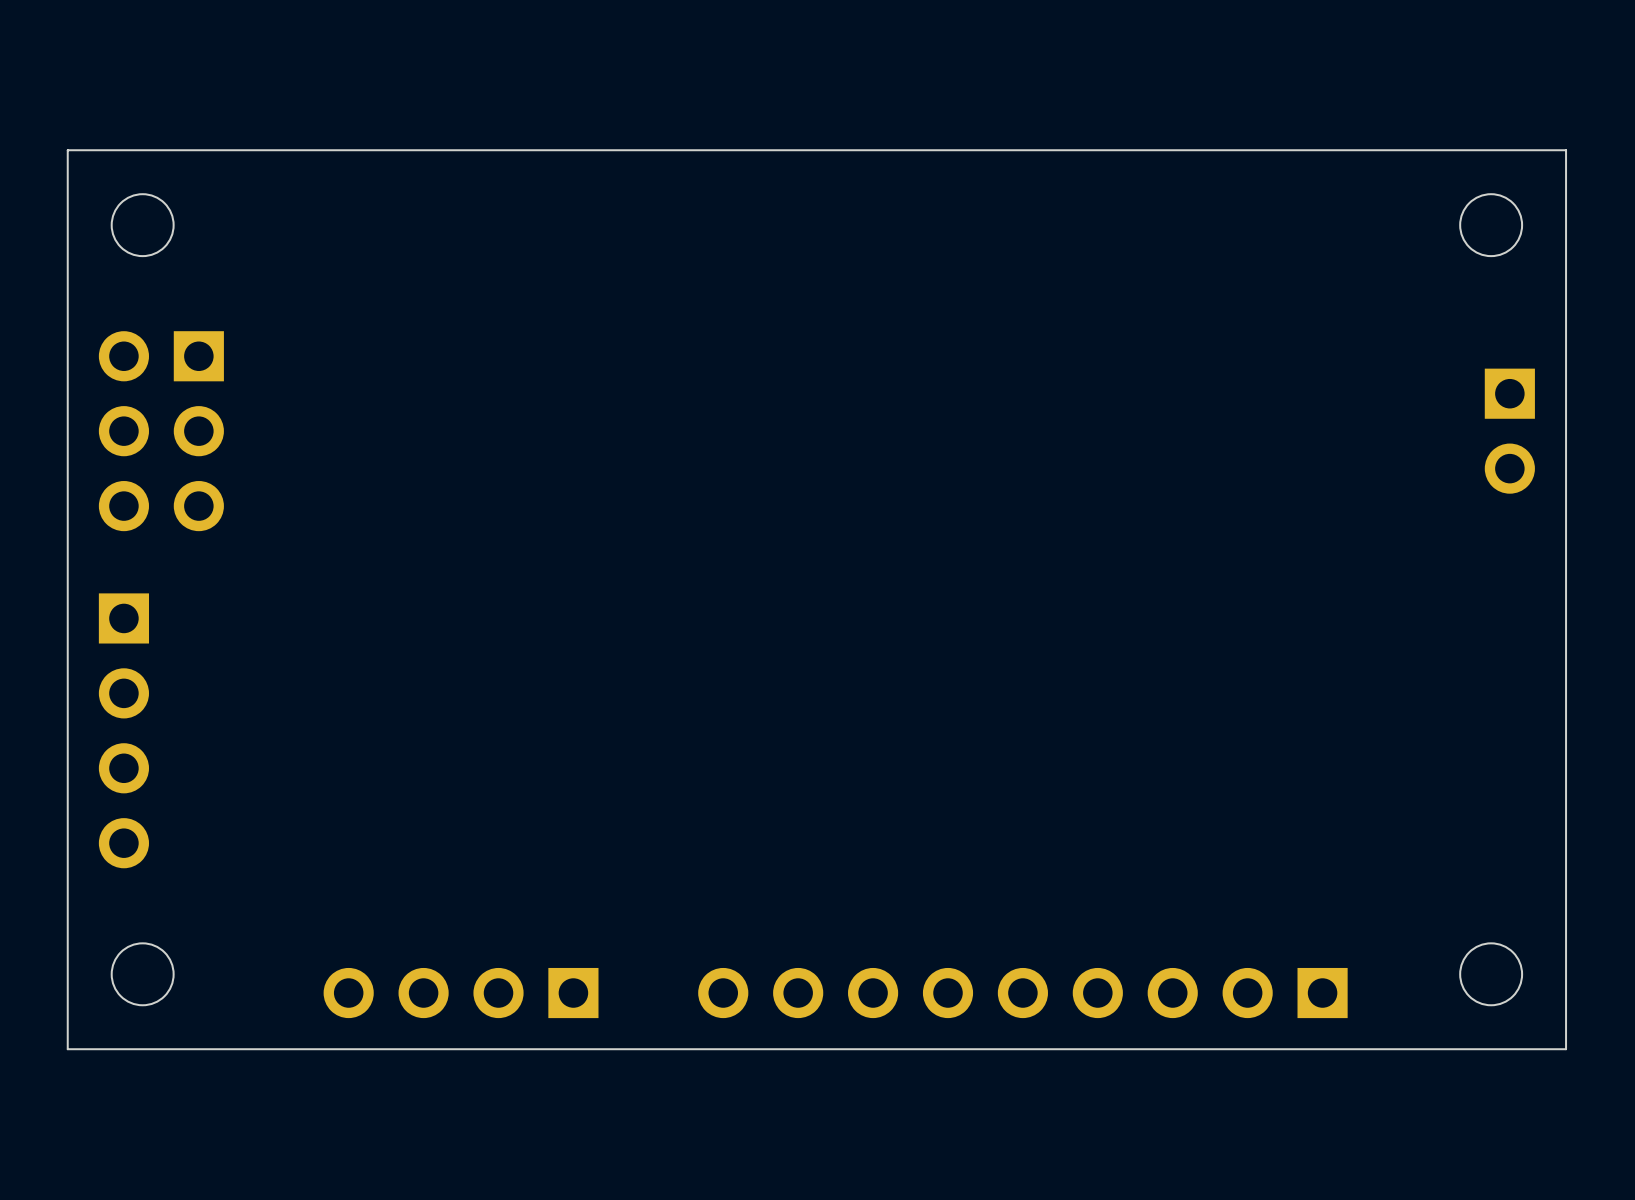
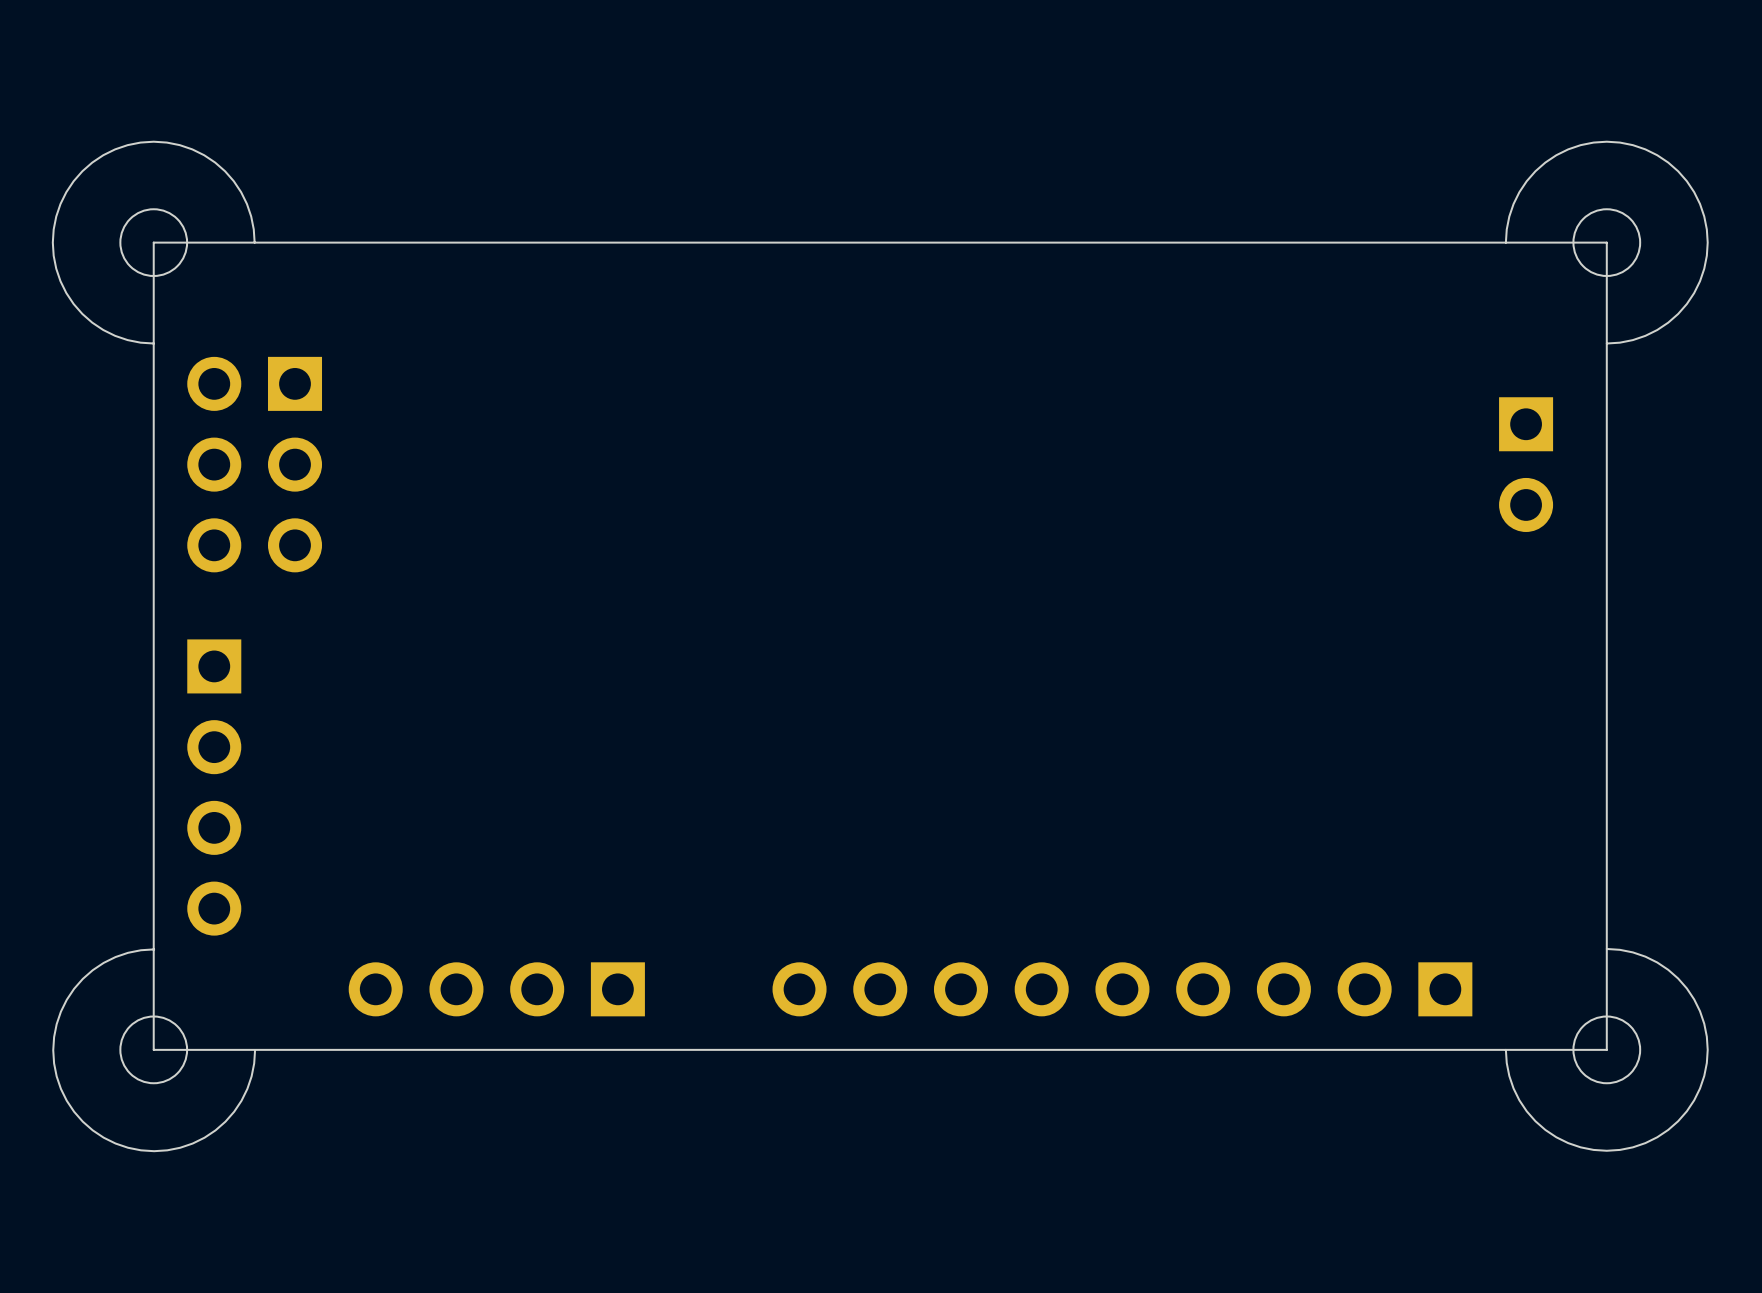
board edge: (1566, 150) (67, 150) (67, 1049) (1566, 1049) (1566, 150) -> (1606, 242) (1606, 1049) (153, 1049) (153, 242) (1606, 242)
board edge: none -> (254, 242) (251, 216) (241, 192) (225, 171) (215, 162) (192, 149) (166, 142) (140, 142) (115, 149) (103, 155) (82, 171) (66, 192) (56, 216) (53, 229) (53, 255) (60, 281) (73, 304) (92, 322) (115, 335) (127, 340) (153, 343)
board edge: none -> (1505, 242) (1509, 216) (1513, 204) (1526, 181) (1545, 162) (1568, 149) (1593, 142) (1619, 142) (1645, 149) (1668, 162) (1678, 171) (1694, 192) (1704, 216) (1706, 229) (1706, 255) (1700, 281) (1686, 304) (1668, 322) (1657, 330) (1632, 340) (1606, 343)
part position: (161, 431) -> (254, 464)
part position: (1509, 431) -> (1526, 464)
part position: (123, 730) -> (214, 787)
board edge: none -> (1606, 948) (1632, 952) (1657, 962) (1678, 978) (1686, 988) (1700, 1011) (1706, 1036) (1707, 1049) (1704, 1075) (1694, 1100) (1678, 1121) (1657, 1137) (1632, 1147) (1606, 1150) (1593, 1149) (1568, 1143) (1545, 1129) (1526, 1111) (1513, 1088) (1509, 1075) (1505, 1049)
board edge: none -> (154, 949) (128, 952) (103, 962) (82, 978) (66, 999) (60, 1011) (54, 1037) (53, 1050) (56, 1076) (66, 1100) (82, 1121) (103, 1137) (128, 1147) (140, 1150) (167, 1150) (192, 1143) (204, 1137) (225, 1121) (241, 1100) (251, 1076) (255, 1050)
part position: (461, 993) -> (496, 989)
part position: (1022, 993) -> (1122, 989)

